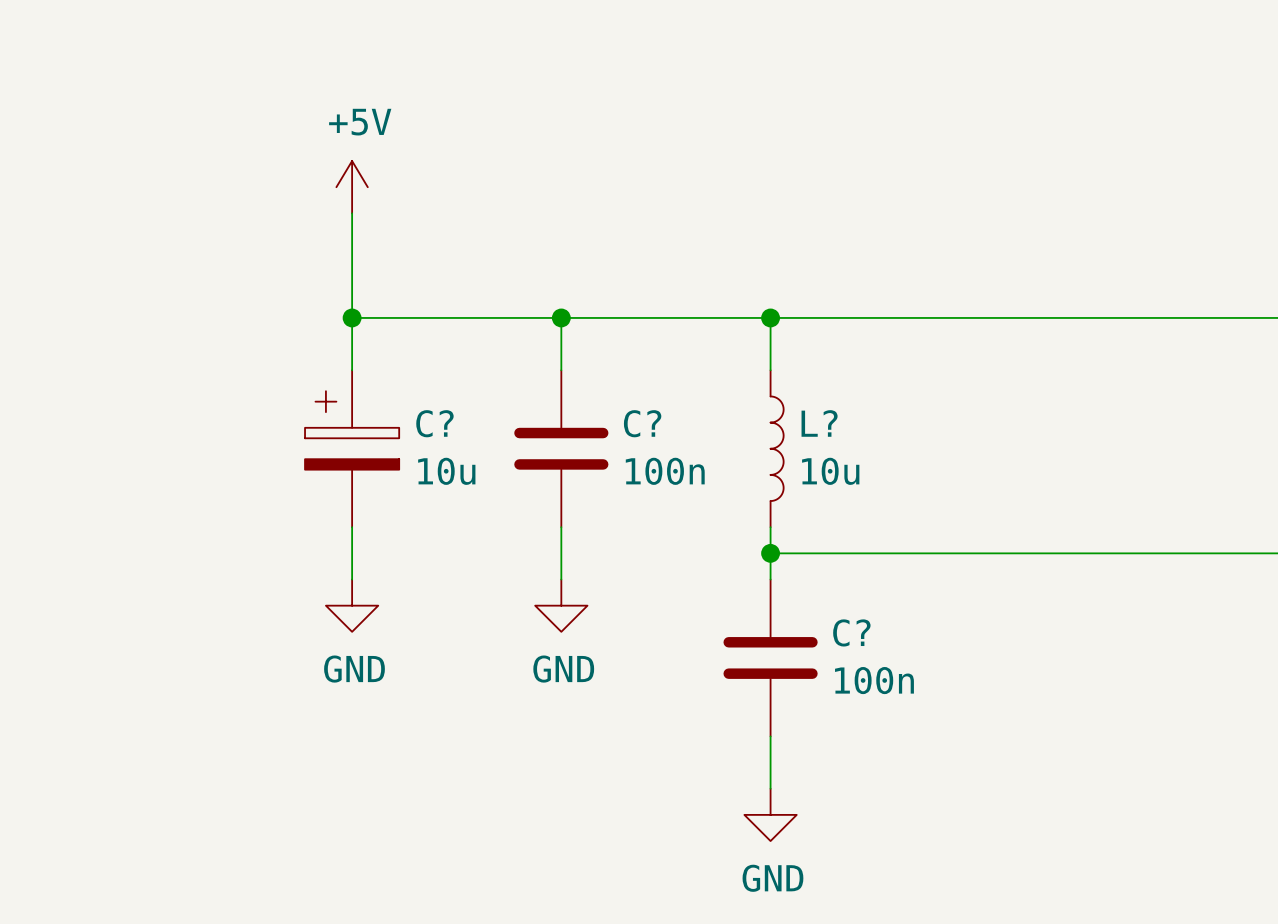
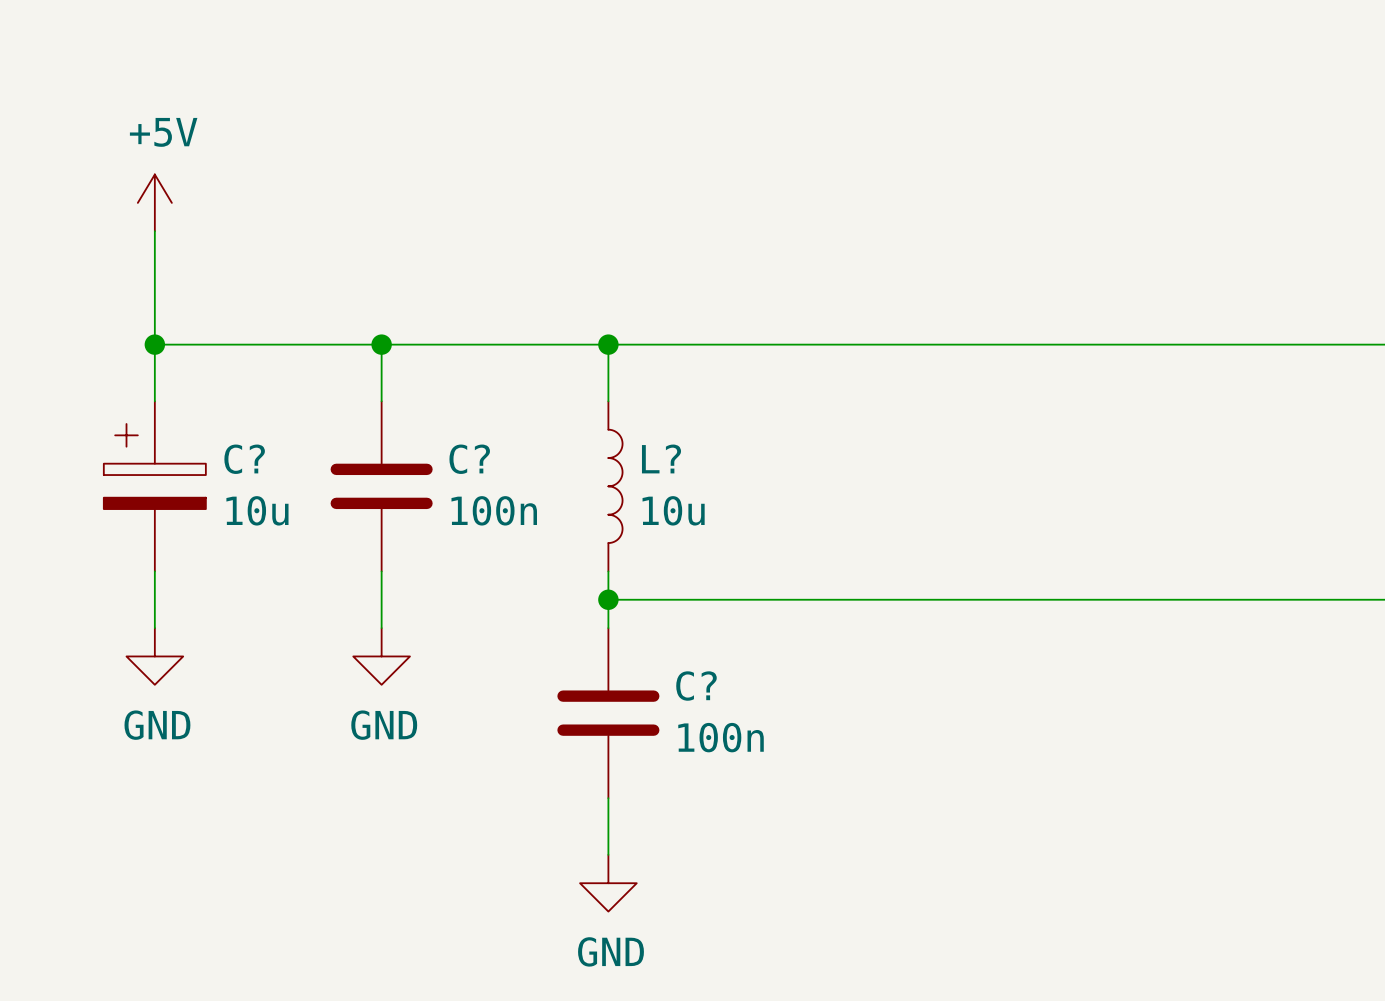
power symbol position: +5V (352, 187) -> +5V (154, 202)
wire: none -> (154, 231) (154, 401)
wire: (352, 213) (352, 317) -> (154, 344) (381, 344)
junction: none -> (154, 344)
wire: (770, 317) (770, 370) -> none
junction: (770, 317) -> none
C? symbol: [305, 370, 400, 528] -> [330, 401, 433, 572]
C?: none -> 10u (154, 486)
C?: 100n (561, 448) -> none
L? position: (777, 448) -> (615, 486)
C? value: 10u (446, 471) -> 100n (494, 510)
wire: none -> (154, 571) (154, 628)
wire: (770, 527) (770, 579) -> none
wire: none -> (608, 599) (835, 599)
junction: none -> (608, 599)
junction: (770, 553) -> none
power symbol: none -> GND (154, 656)
power symbol: GND (561, 605) -> none
C?: none -> 100n (608, 713)
C?: 100n (770, 657) -> none
wire: (770, 736) (770, 788) -> (608, 798) (608, 854)
power symbol: none -> GND (608, 883)
power symbol: GND (770, 814) -> none

